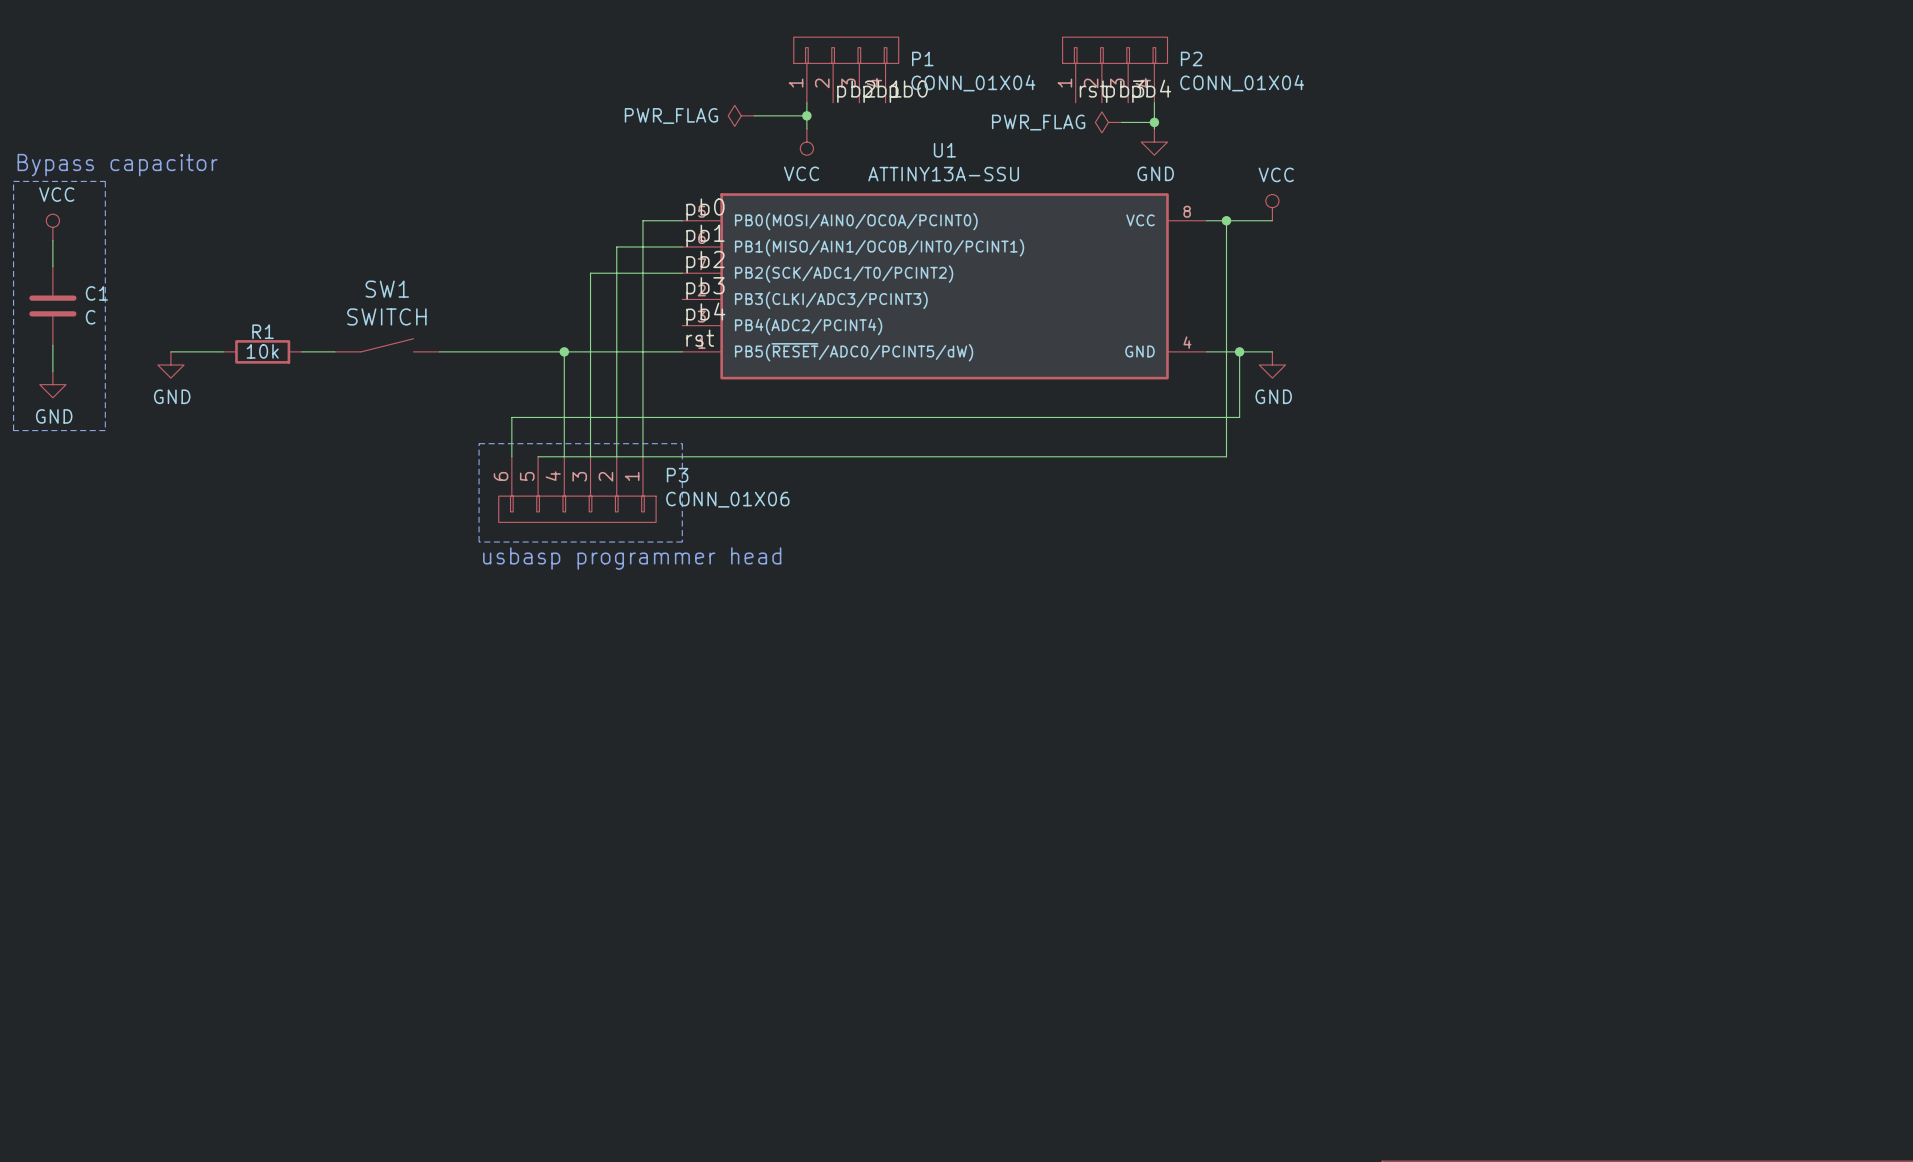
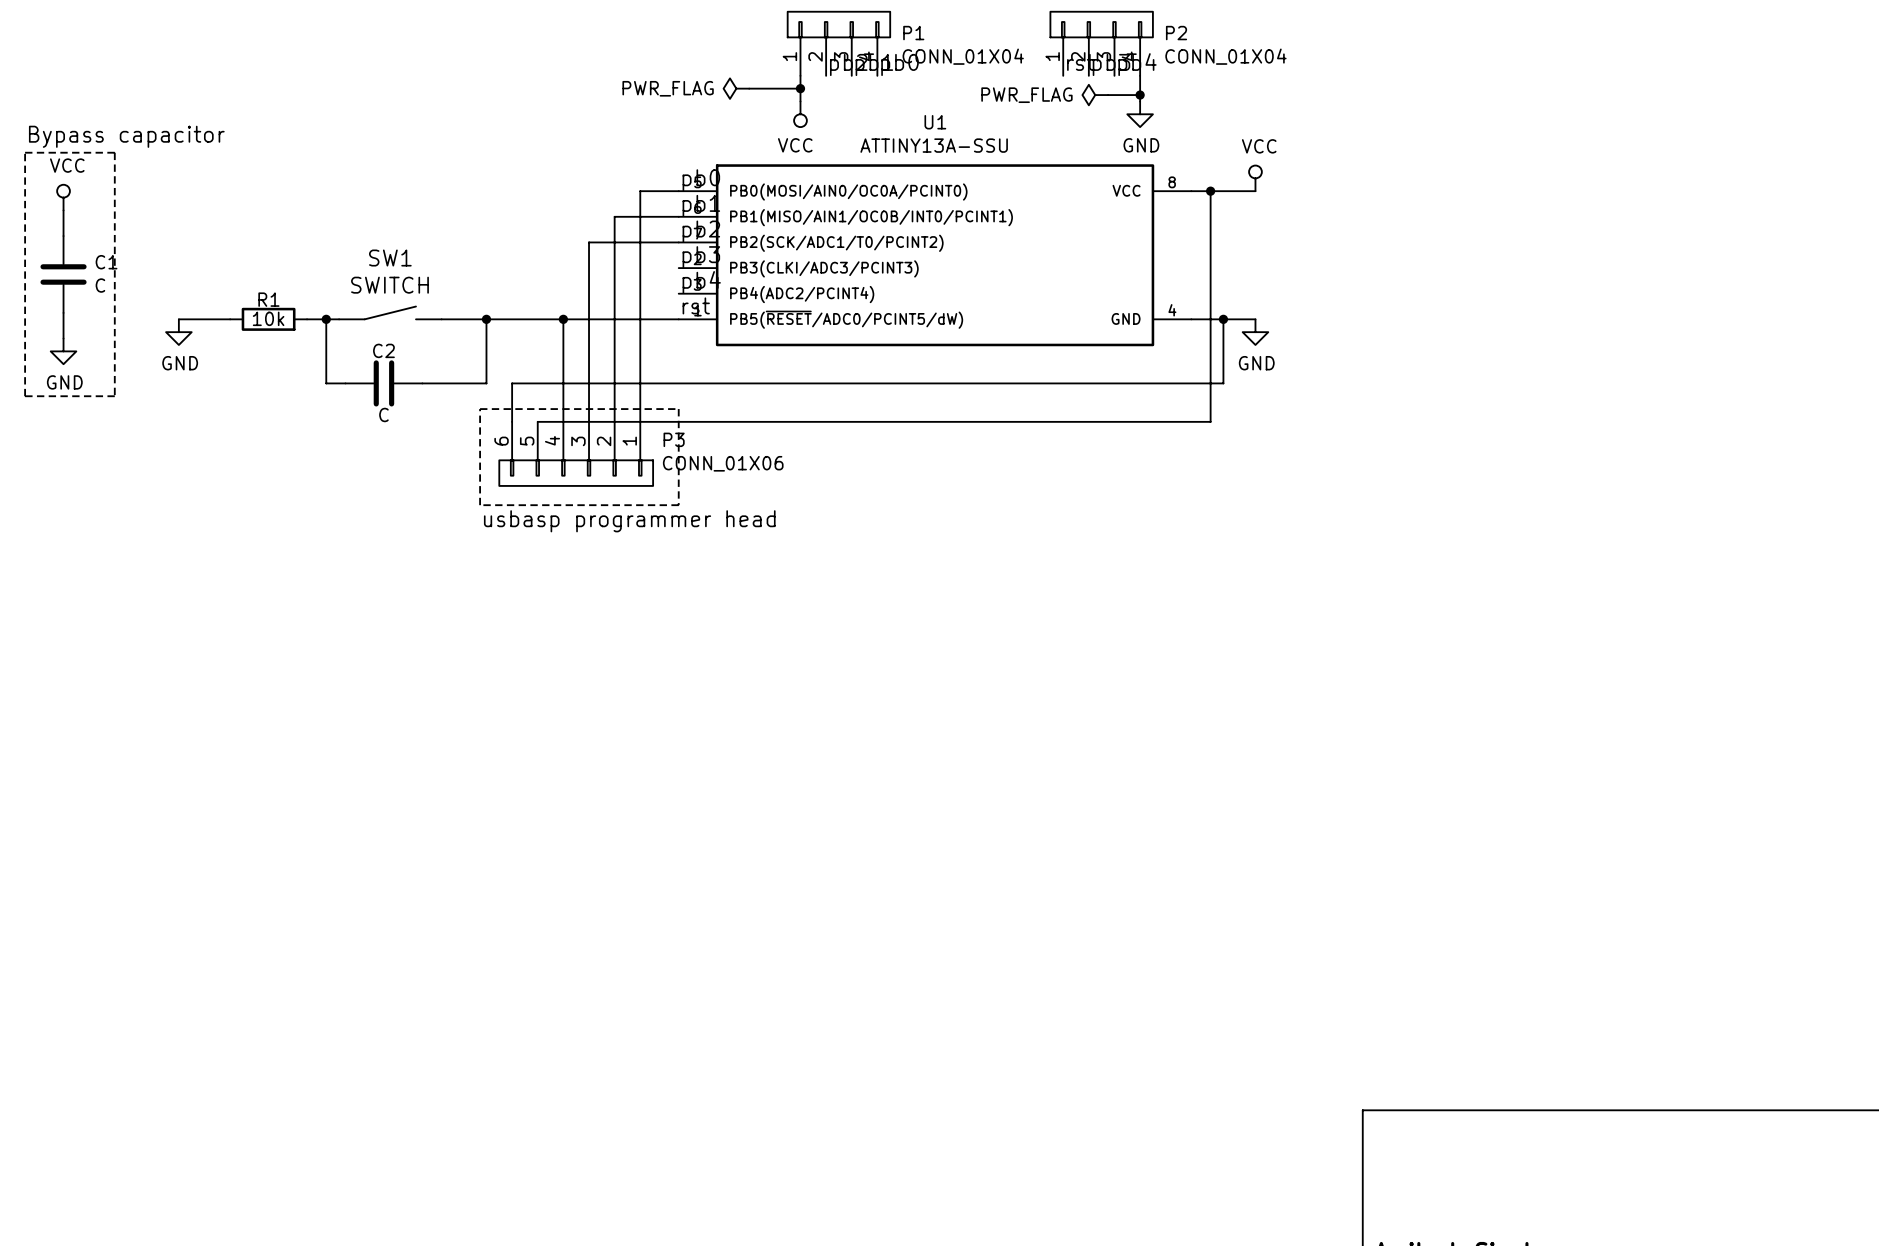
wire: none -> (326, 319) (326, 383) (345, 383)
junction: none -> (326, 319)
wire: none -> (486, 319) (486, 383) (422, 383)
junction: none -> (486, 319)
C2: none -> C (383, 383)

